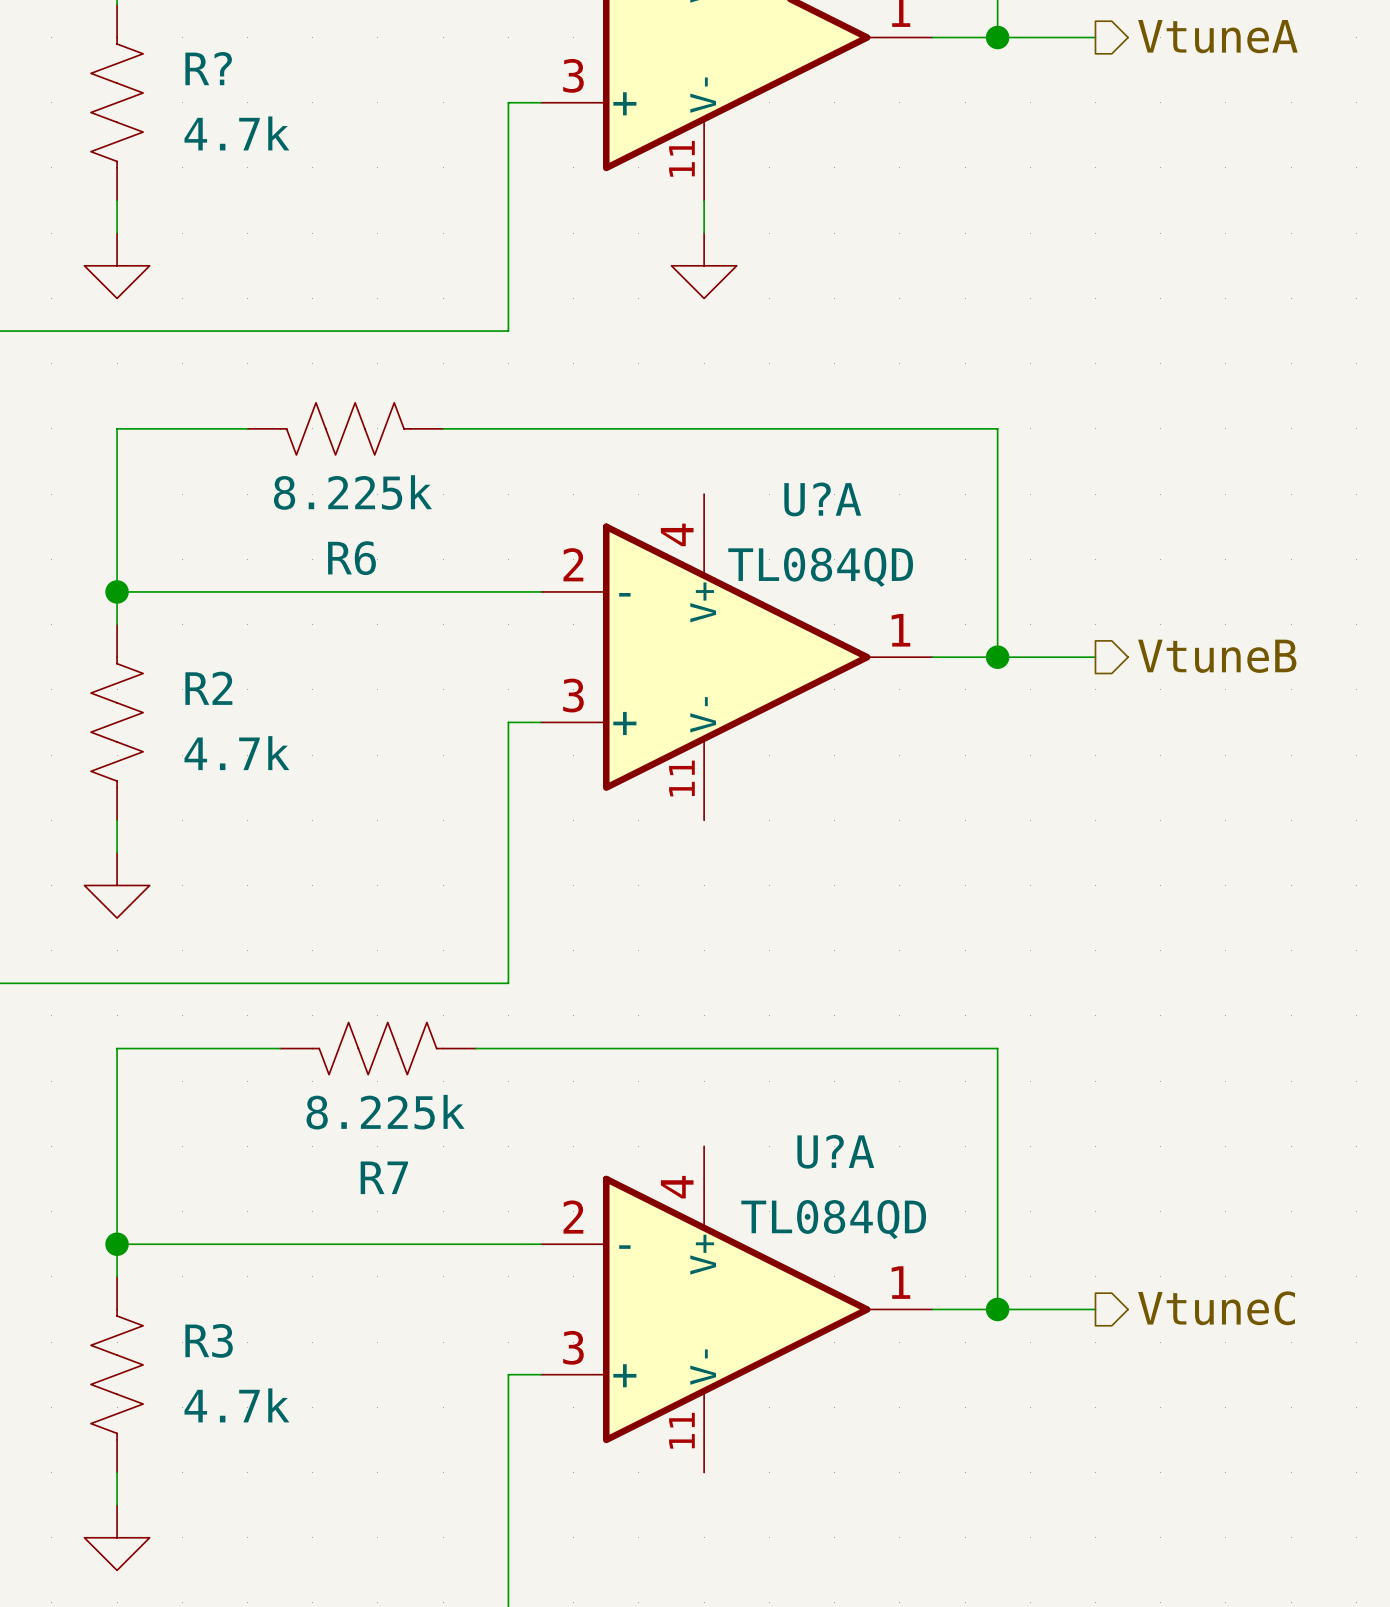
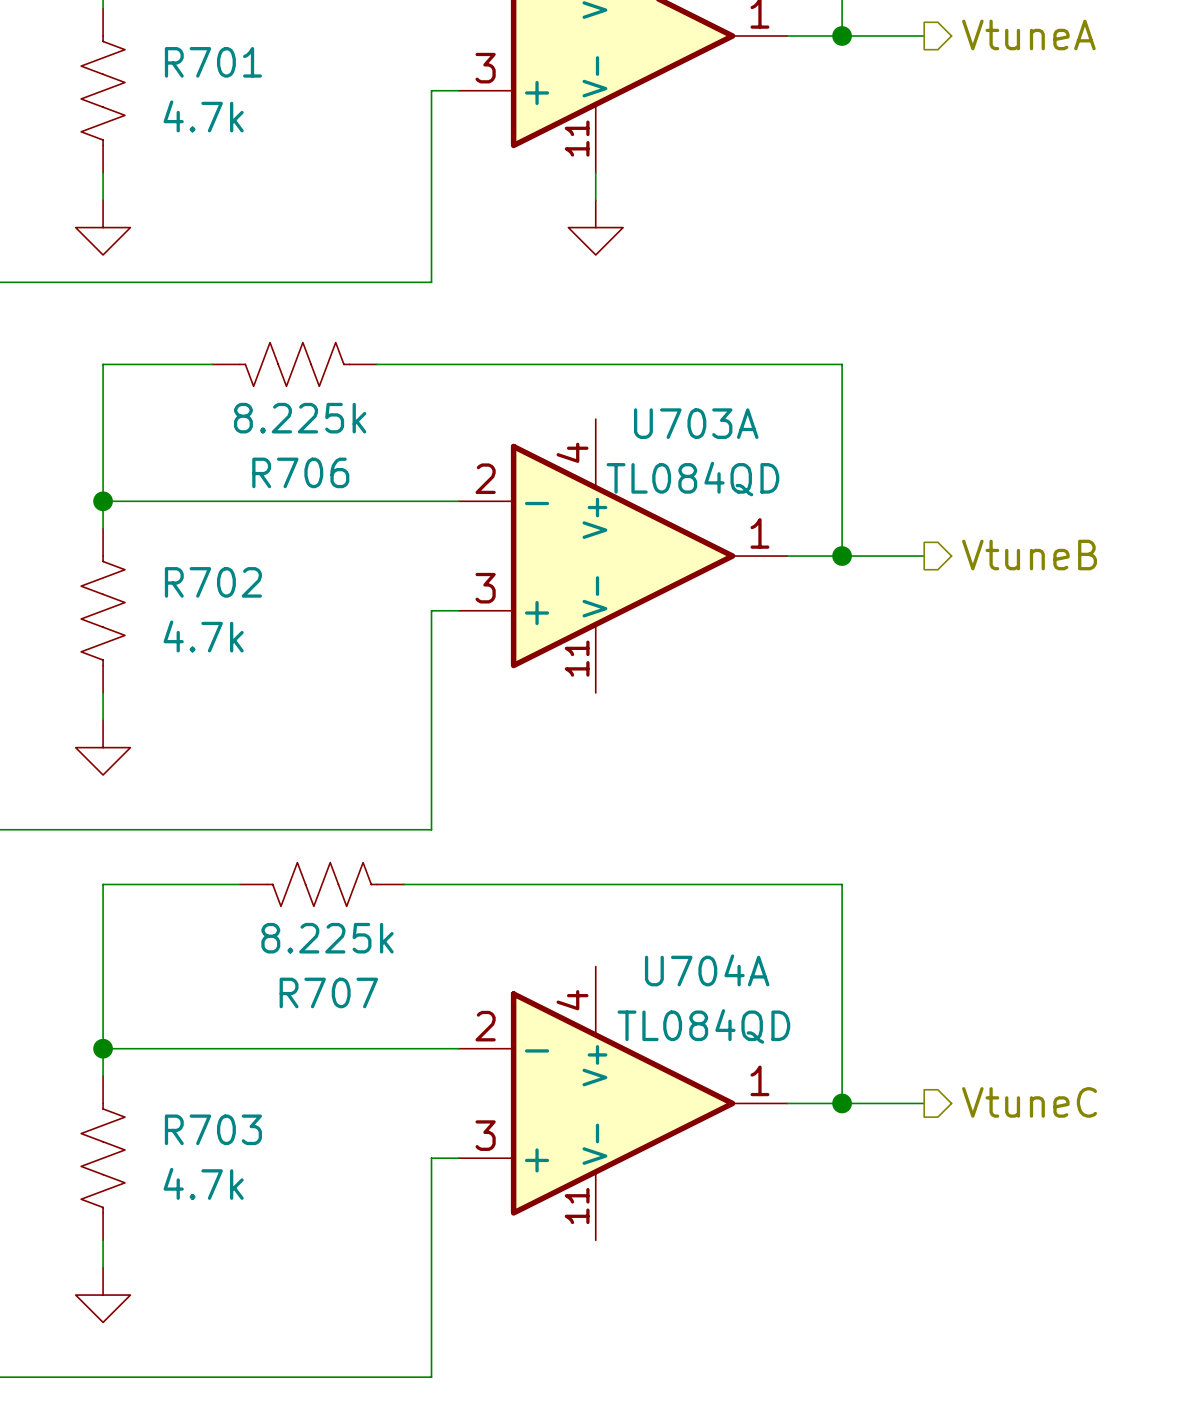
R? name: R? (208, 68) -> R701 (213, 62)
U?A name: U?A (822, 499) -> U703A (696, 423)
R6 name: R6 (351, 558) -> R706 (300, 472)
R2 name: R2 (208, 688) -> R702 (213, 582)
U?A name: U?A (835, 1151) -> U704A (707, 970)
R7 name: R7 (384, 1177) -> R707 (328, 992)
R3 name: R3 (209, 1340) -> R703 (213, 1129)

